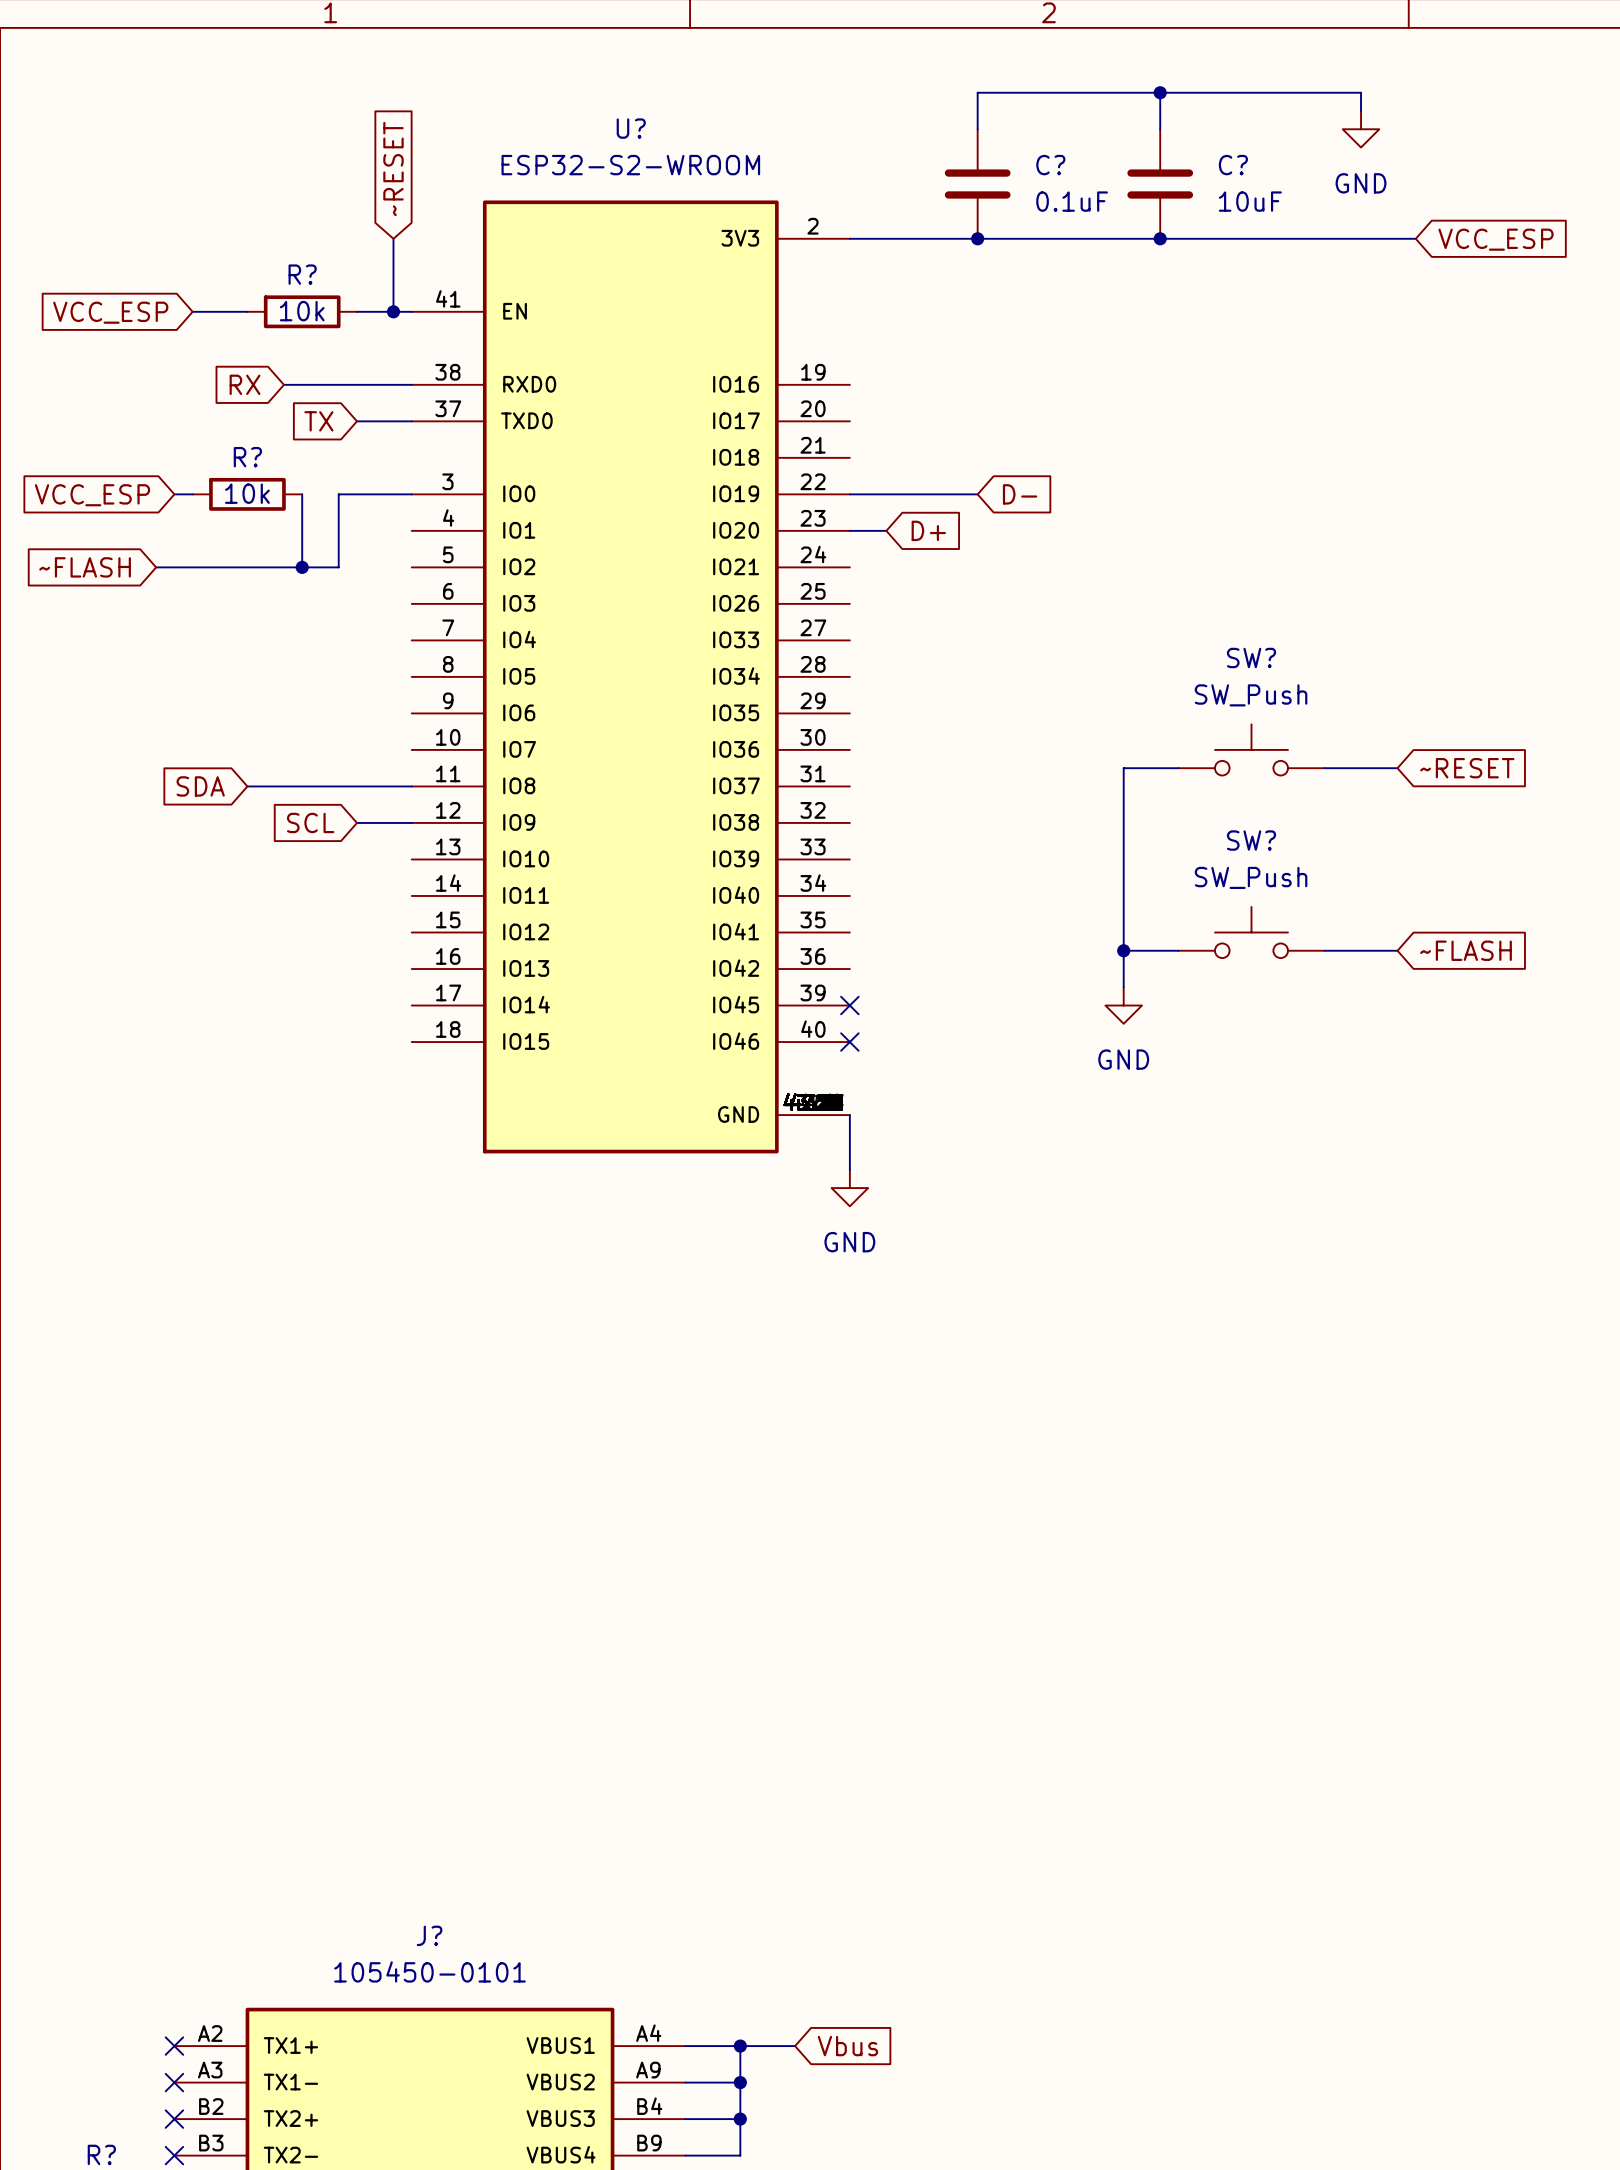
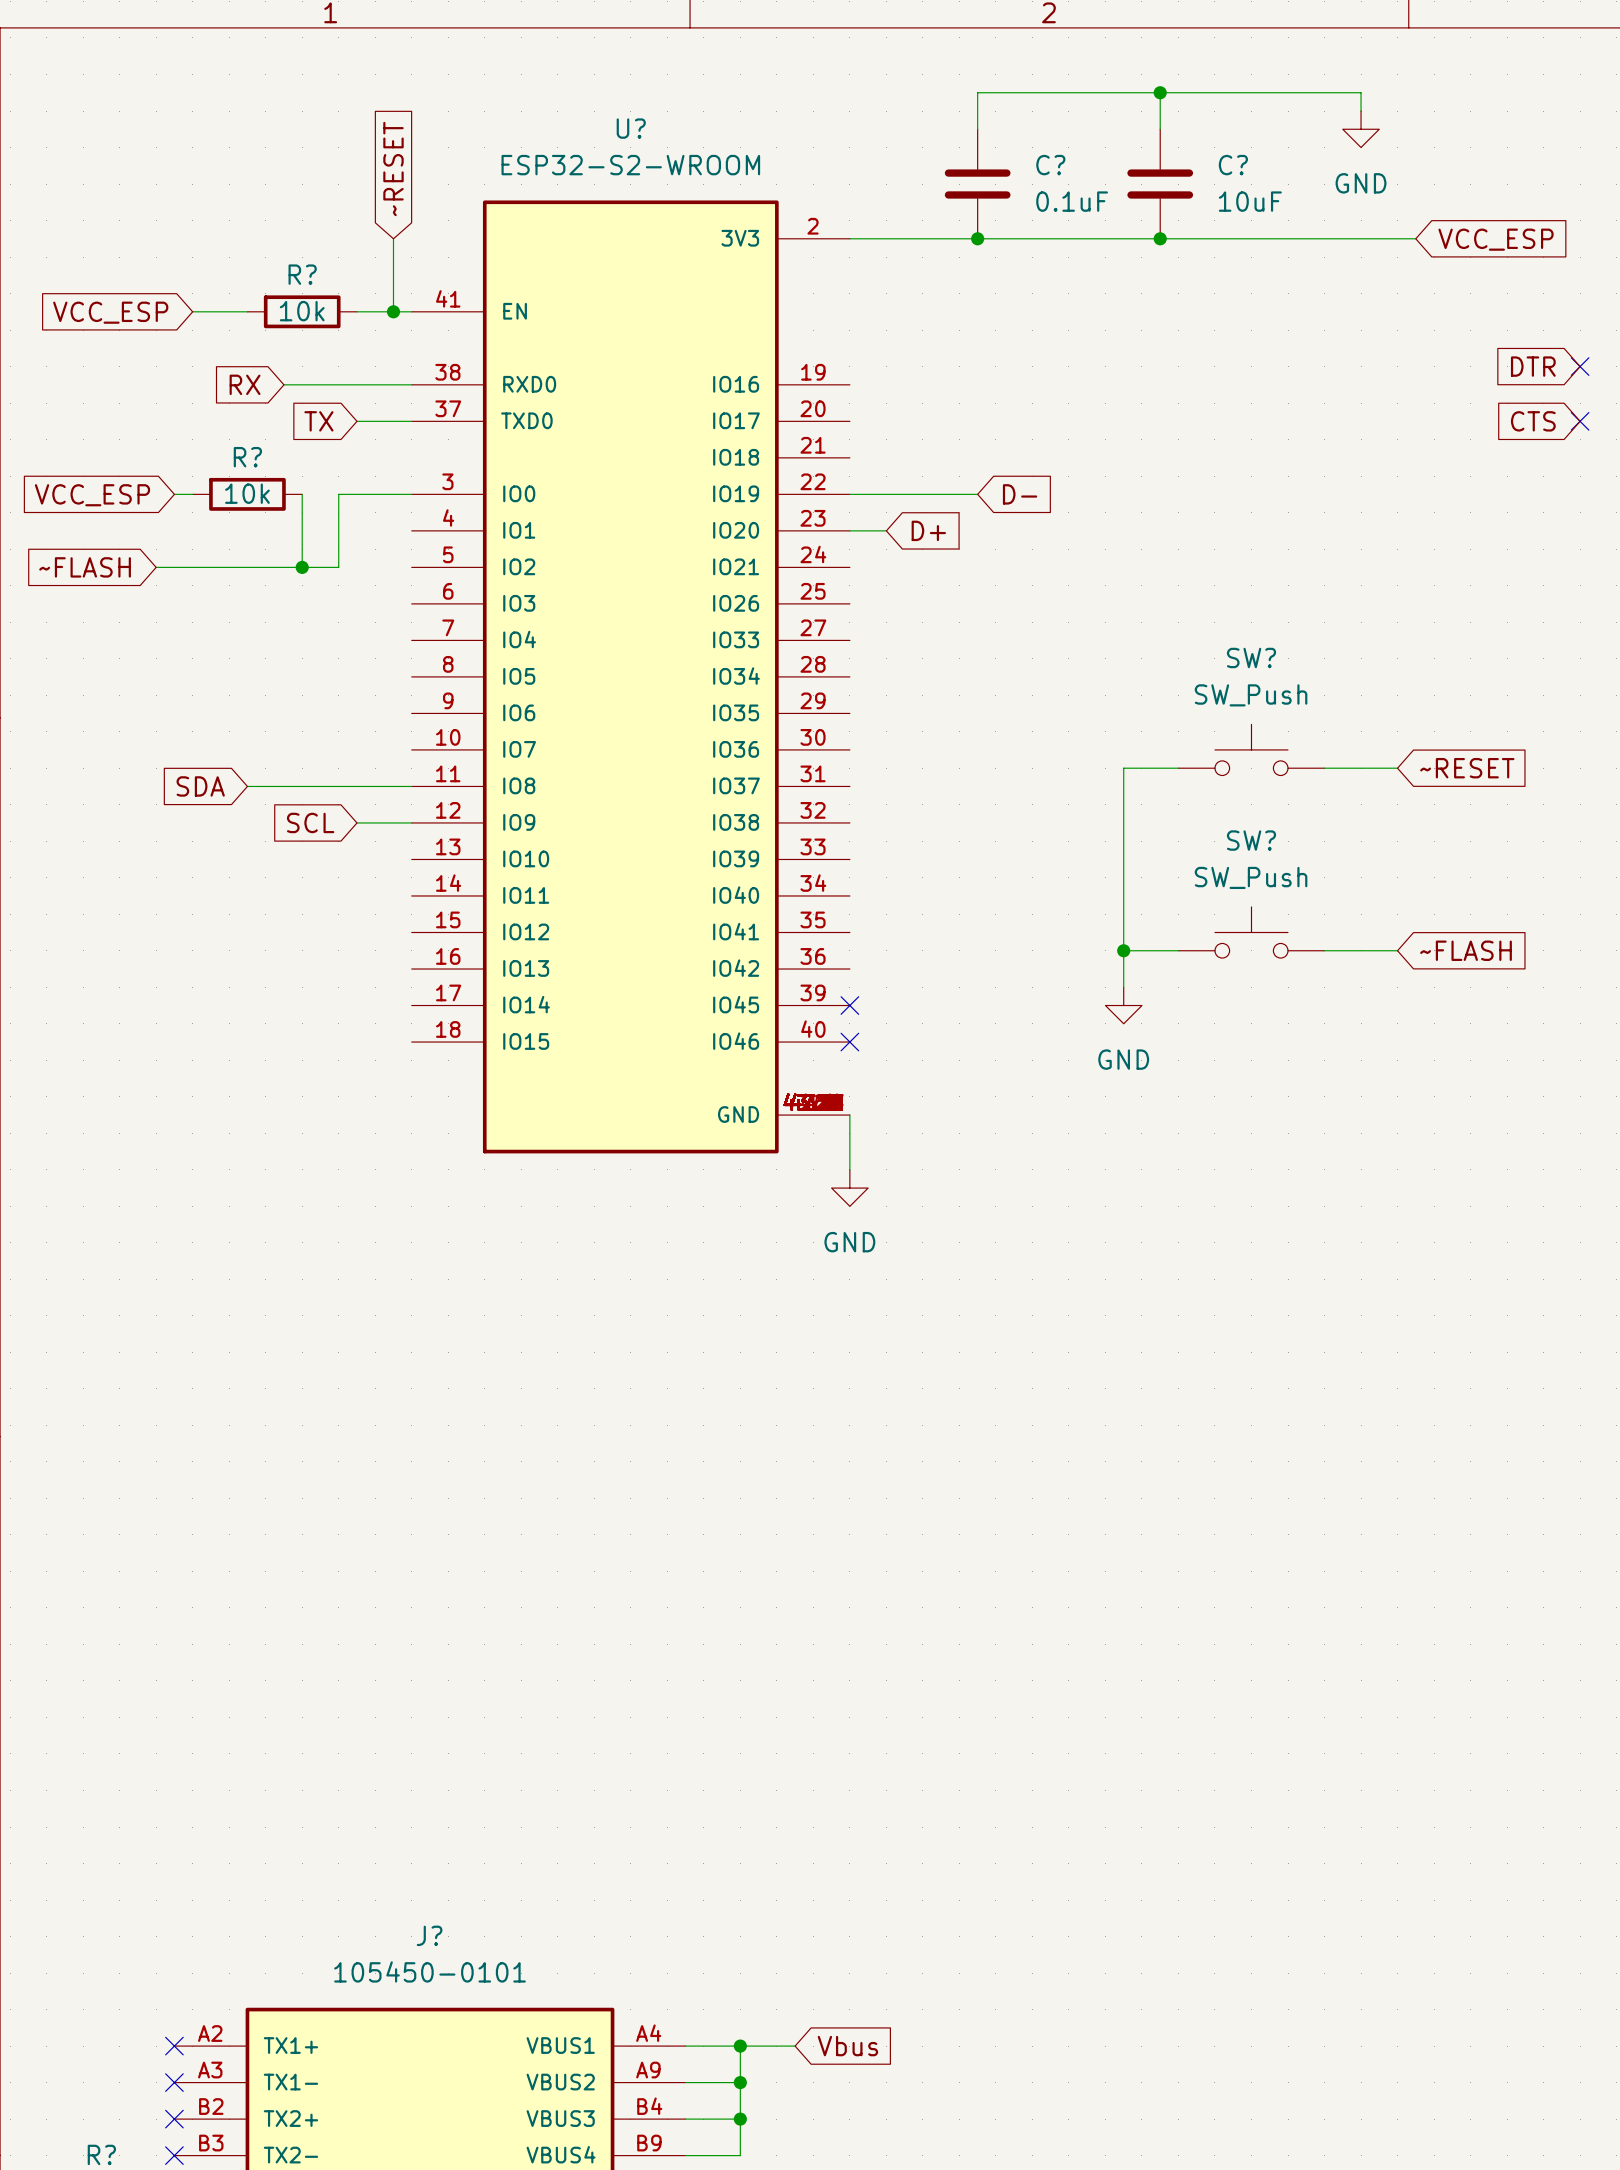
global label: none -> DTR (1533, 366)
no-connect mark: none -> (1580, 366)
global label: none -> CTS (1533, 421)
no-connect mark: none -> (1580, 421)

